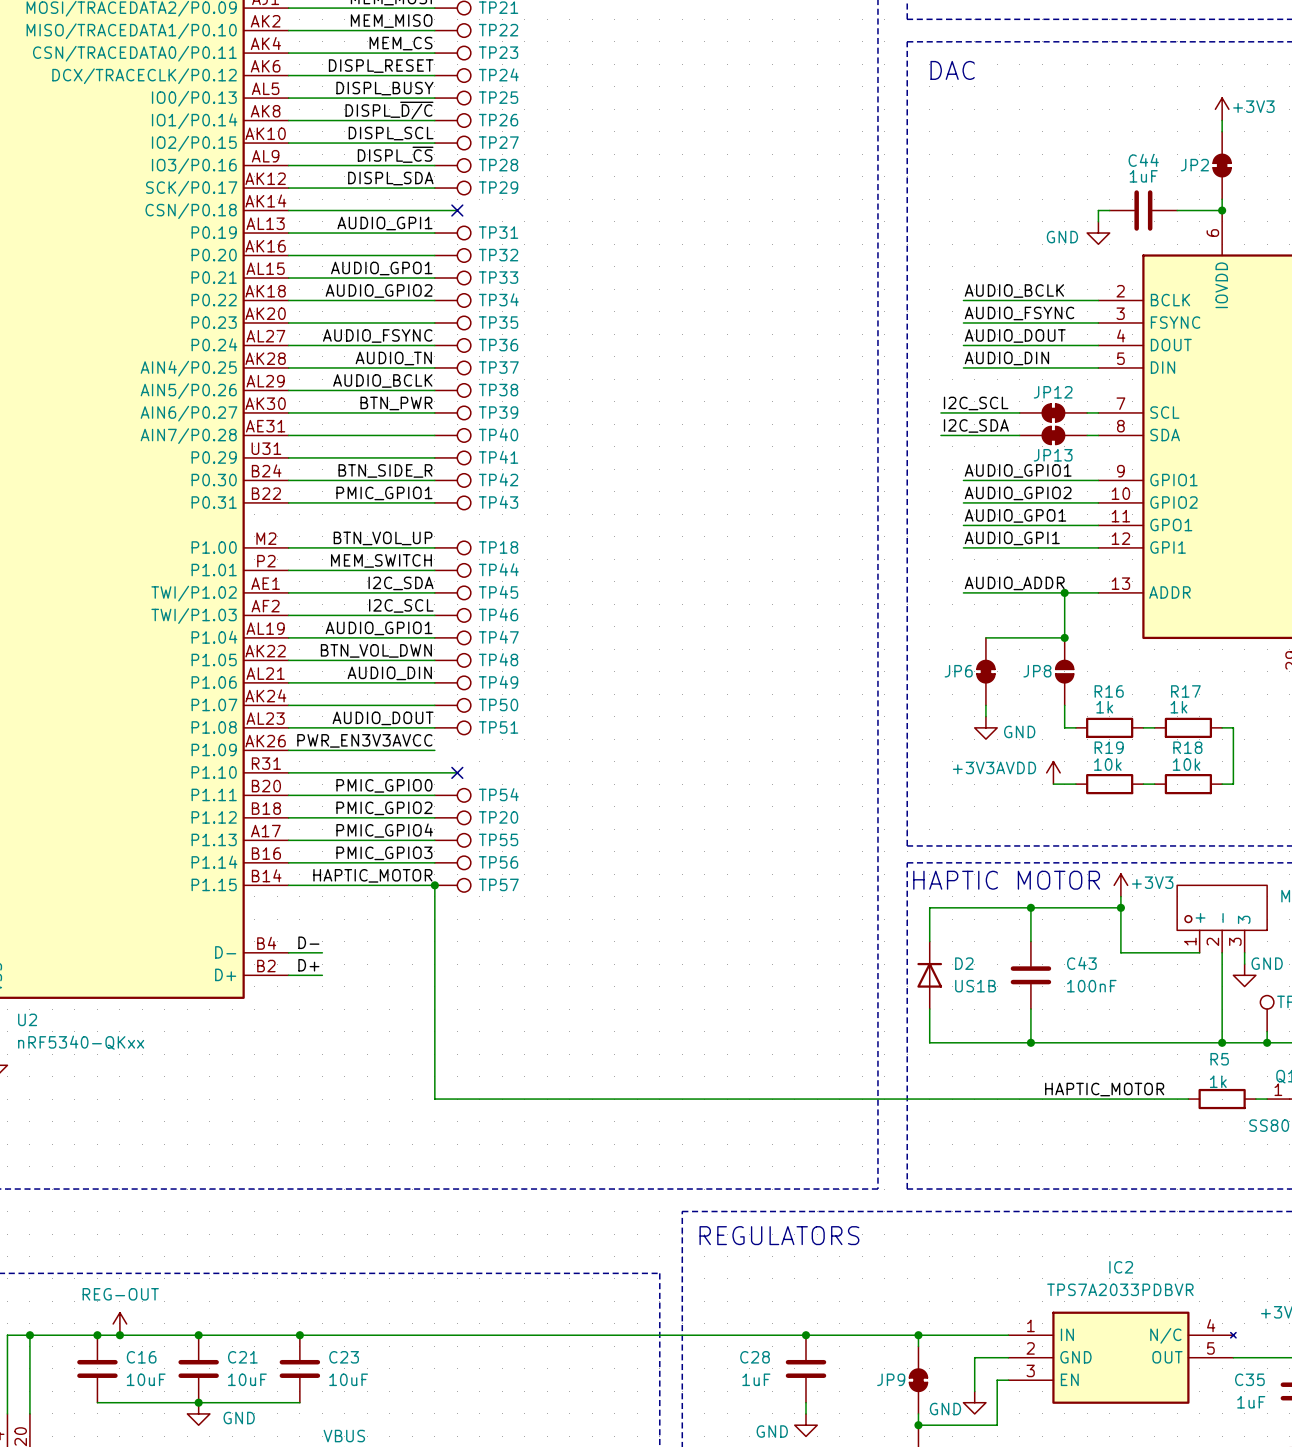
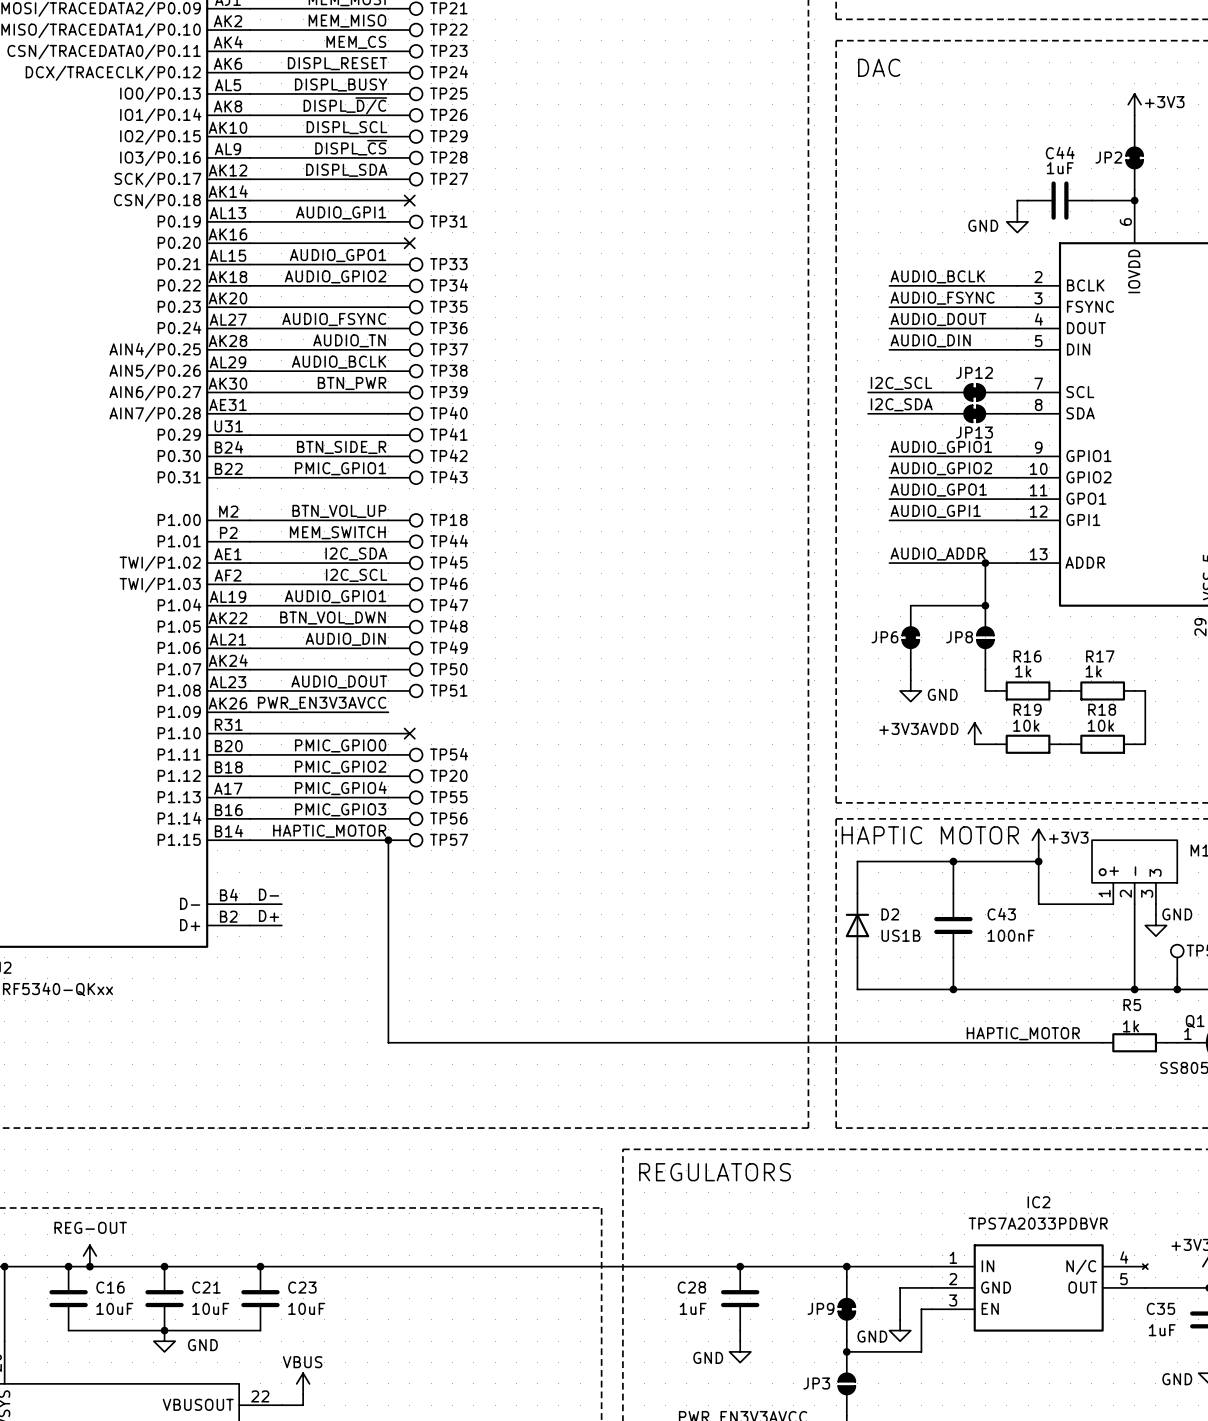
TP27 name: TP27 (498, 142) -> TP29 (448, 136)
TP29 name: TP29 (498, 187) -> TP27 (449, 178)
TP32: (452, 255) -> none
no-connect mark: none -> (409, 243)

